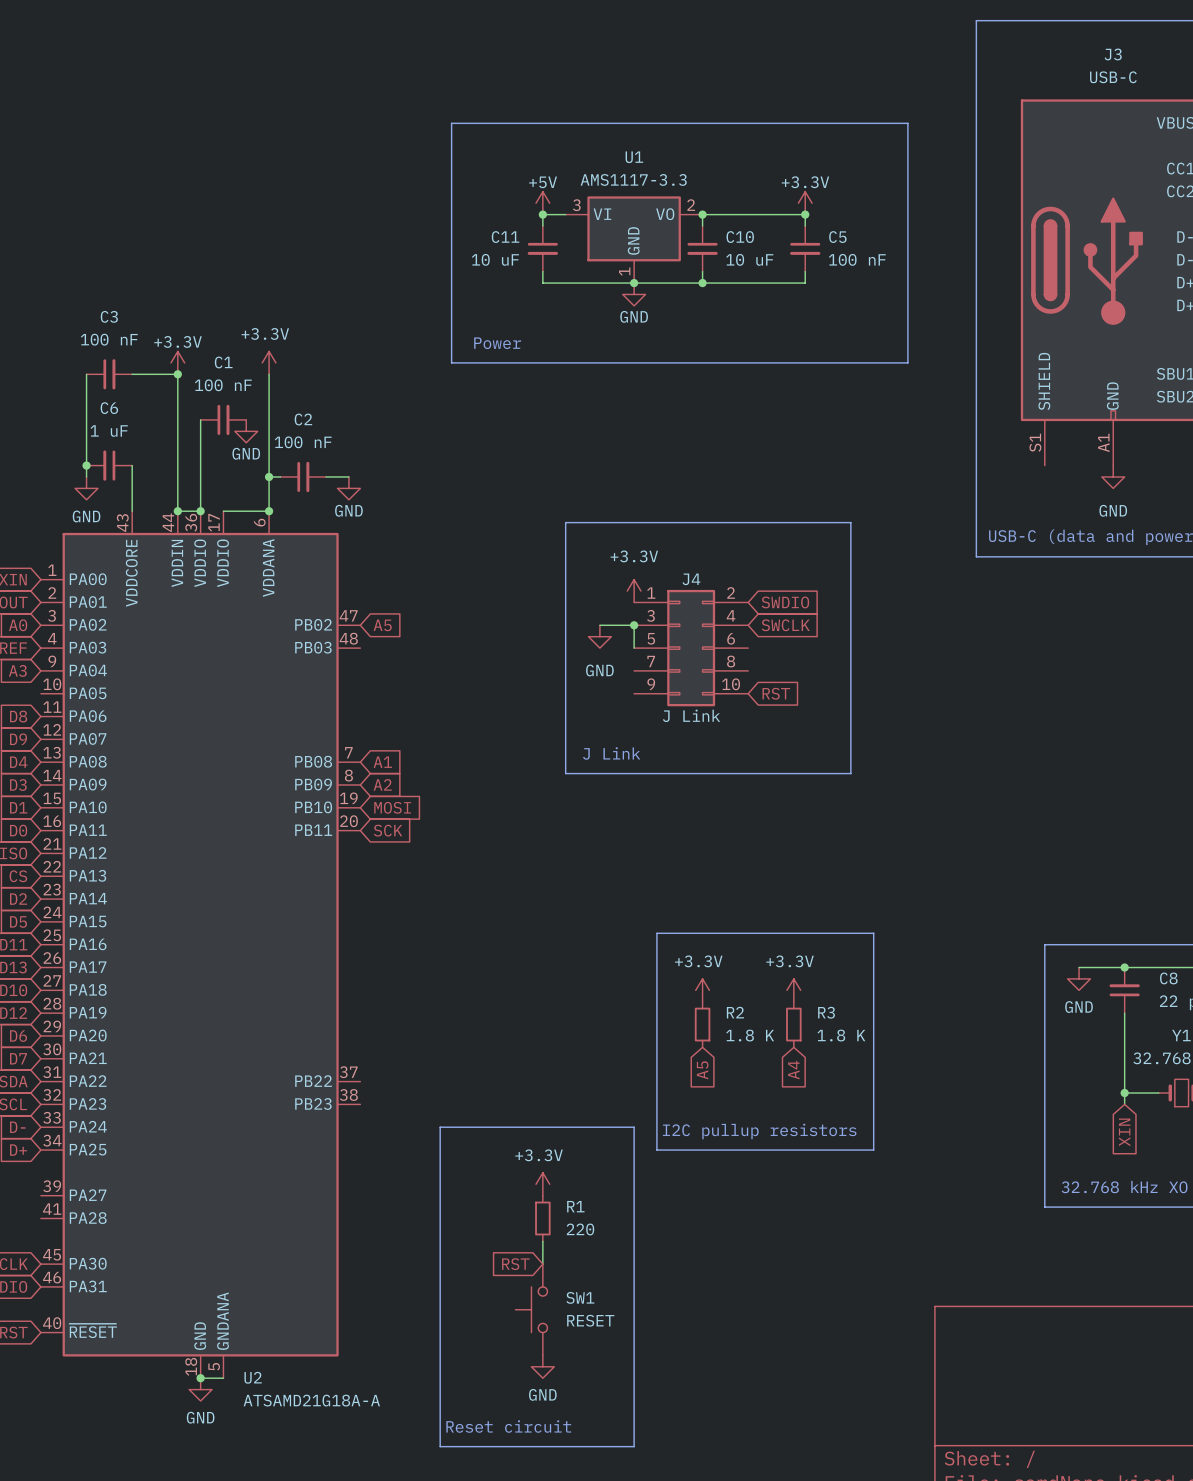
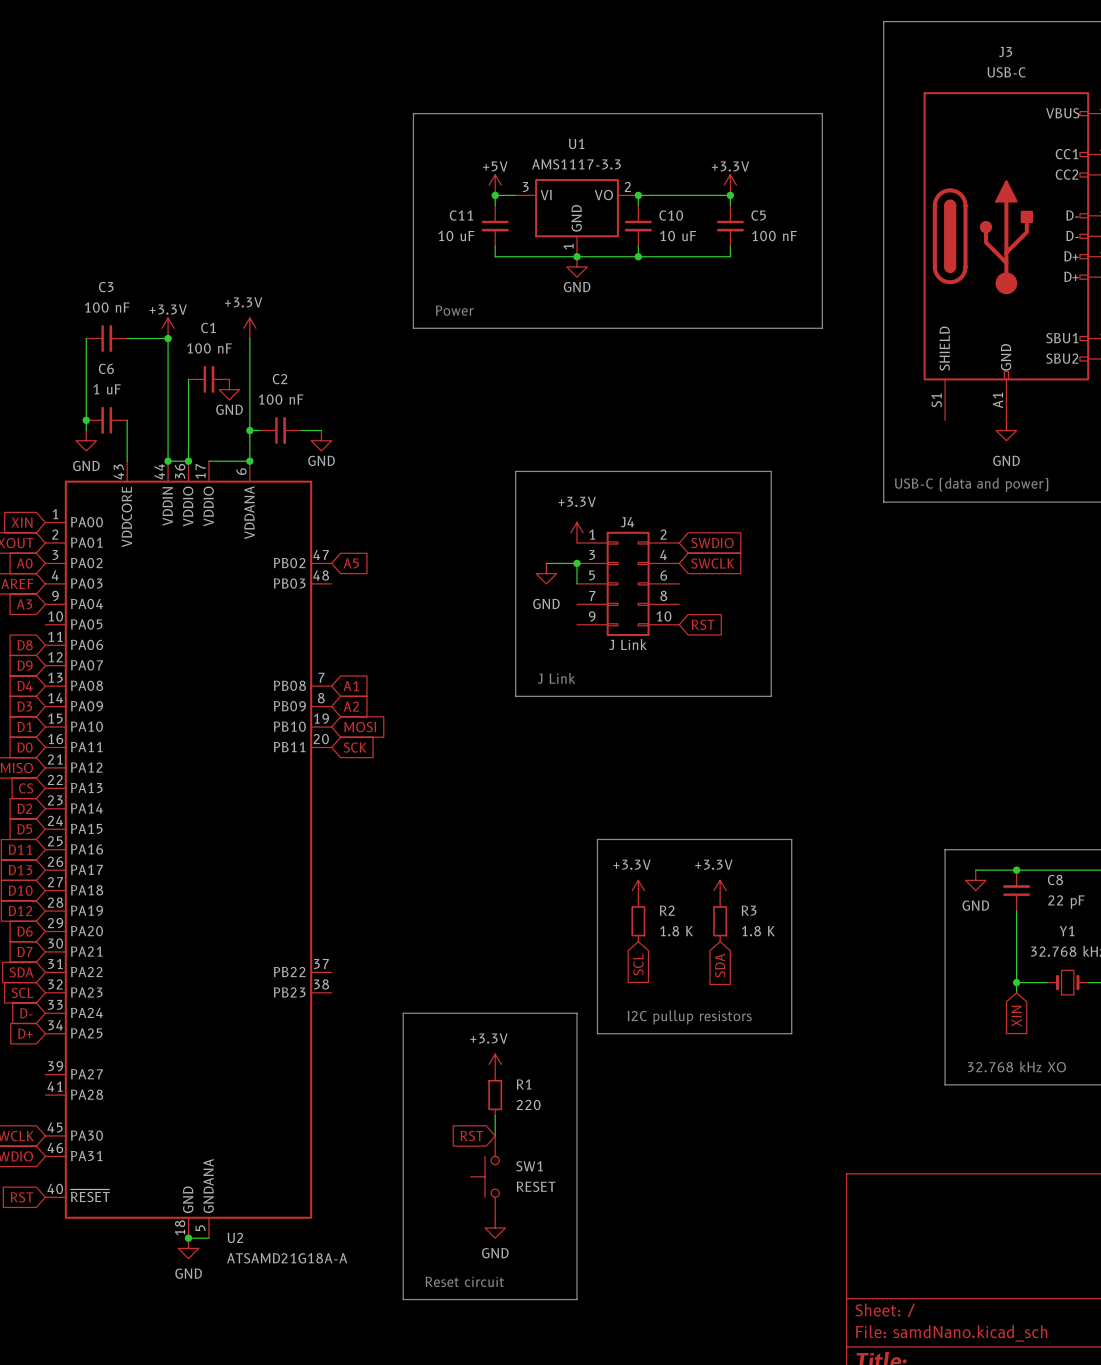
global label: A5 (702, 1070) -> SCL (638, 964)
global label: A4 (793, 1070) -> SDA (720, 965)

